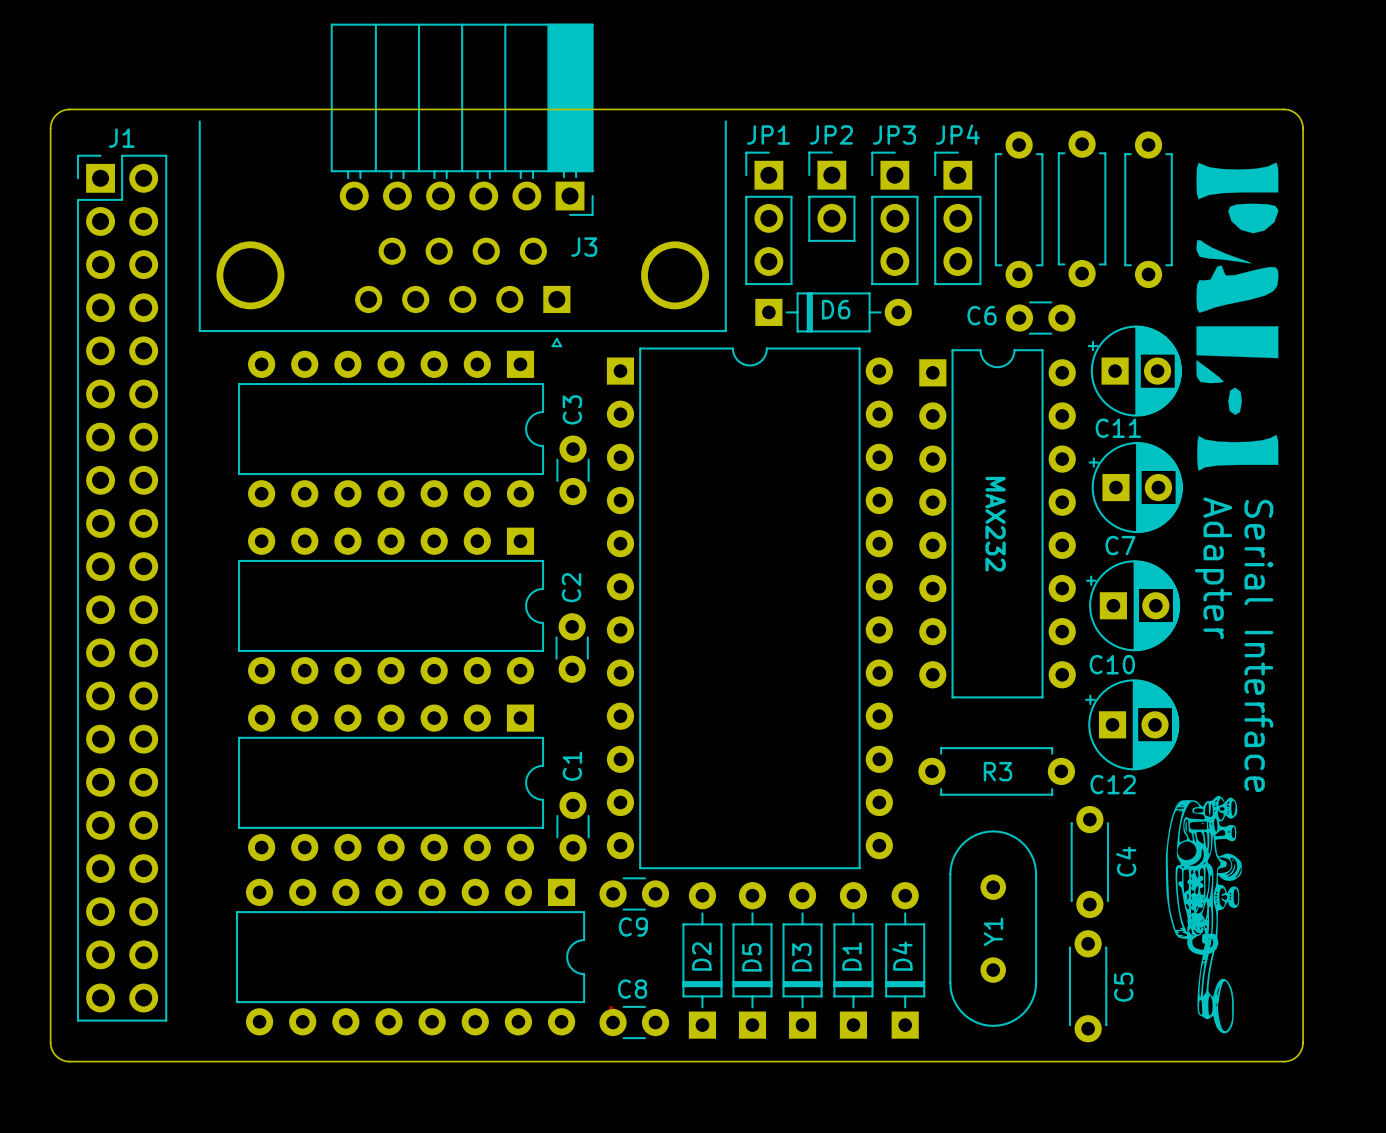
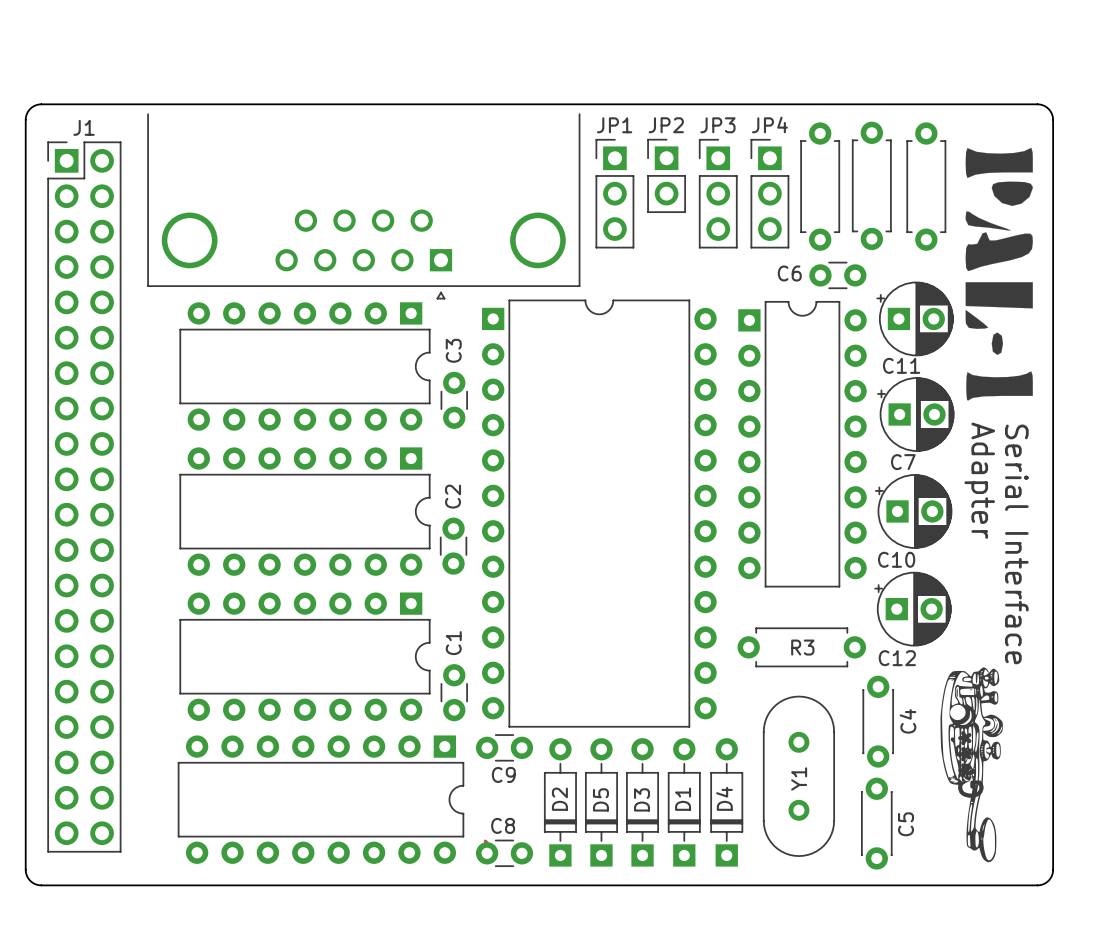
J3: (462, 119) -> none
D6: (833, 312) -> none
text: MAX232 (995, 524) -> none

